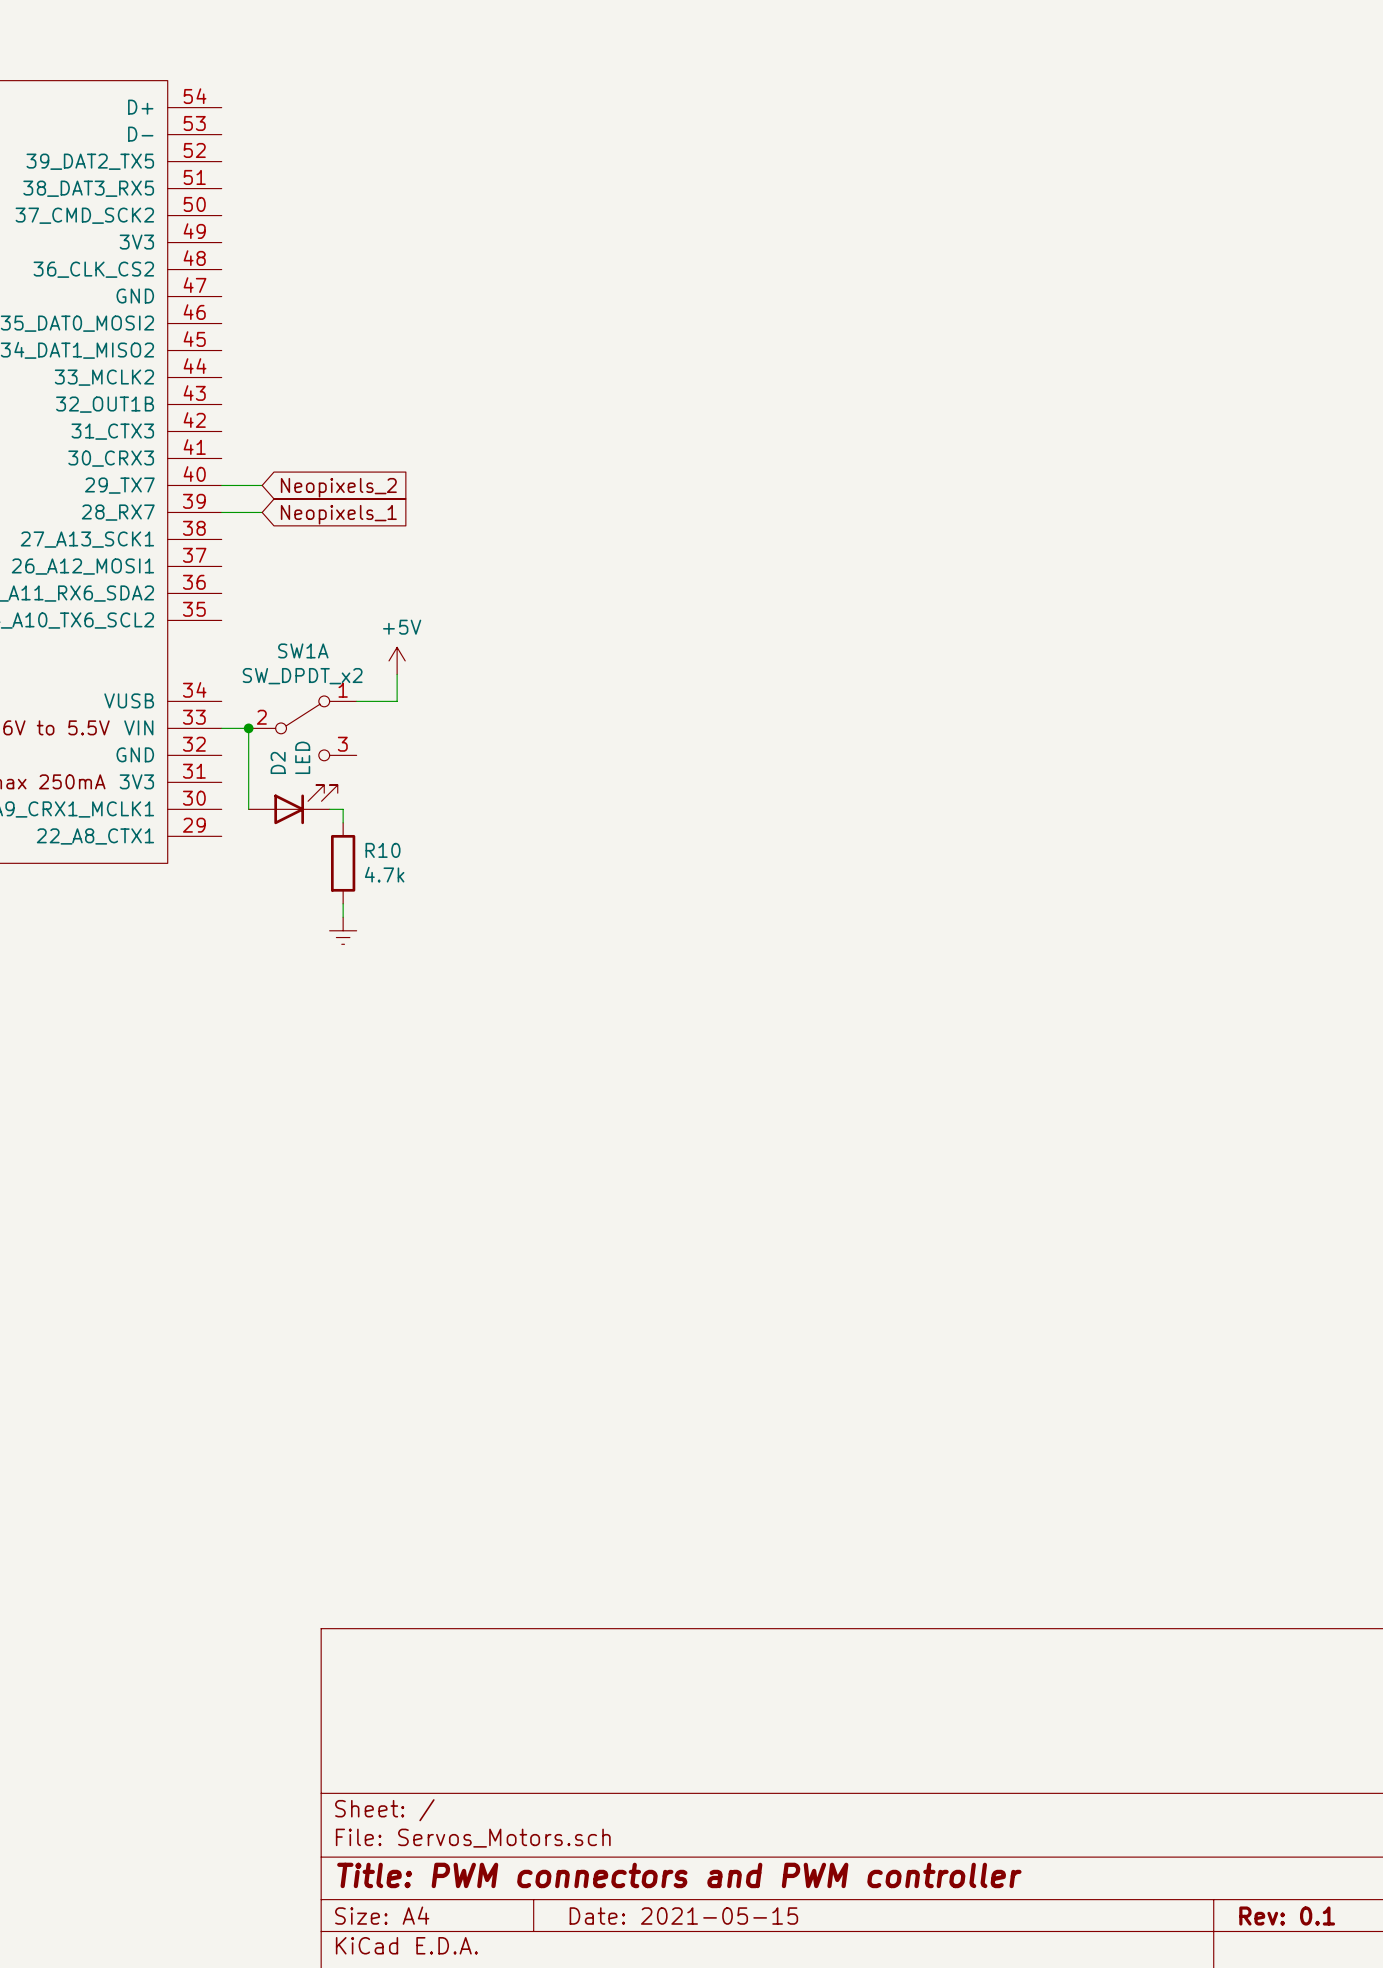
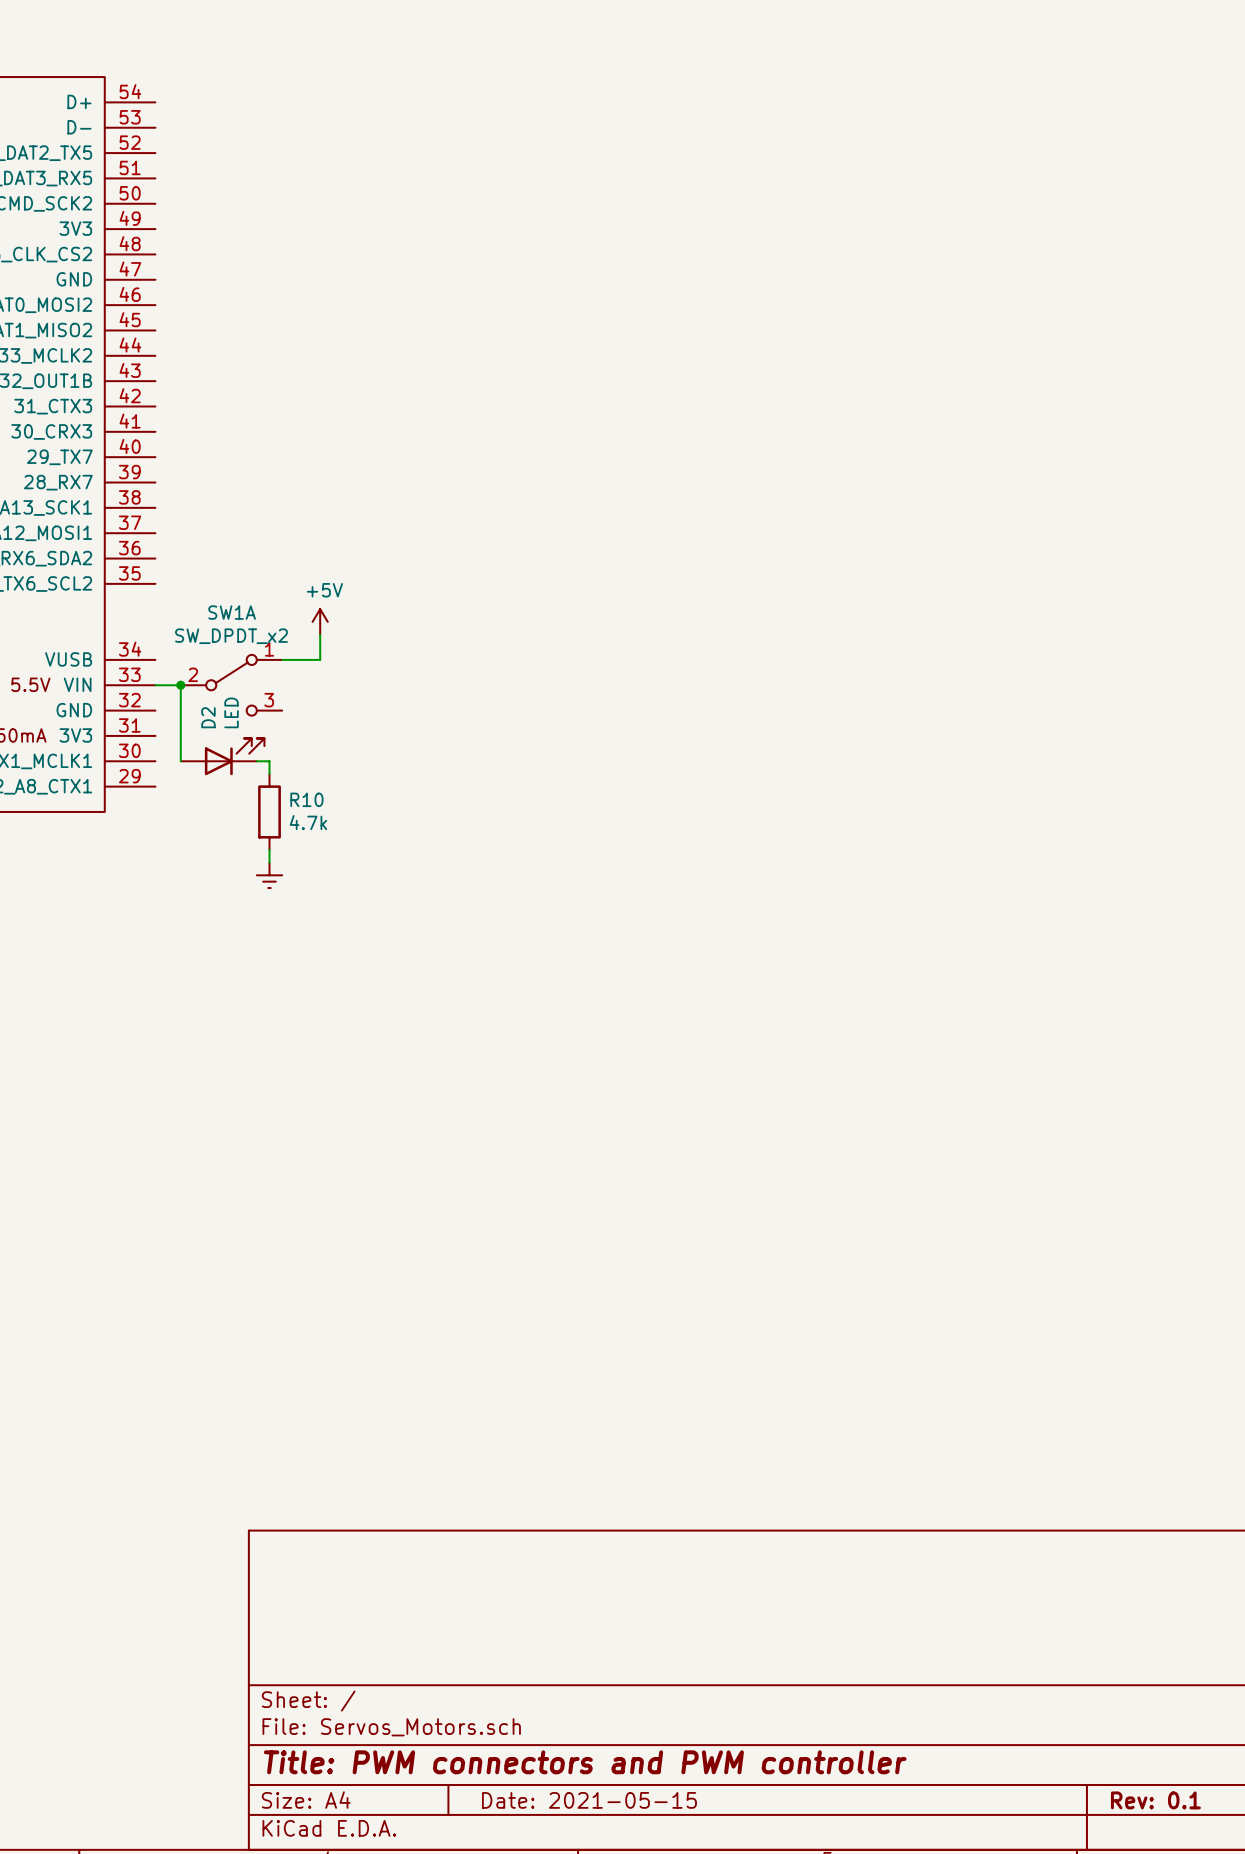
wire: (221, 485) (262, 485) -> none
global label: Neopixels_2 (338, 487) -> none
wire: (221, 512) (262, 512) -> none
global label: Neopixels_1 (338, 514) -> none

